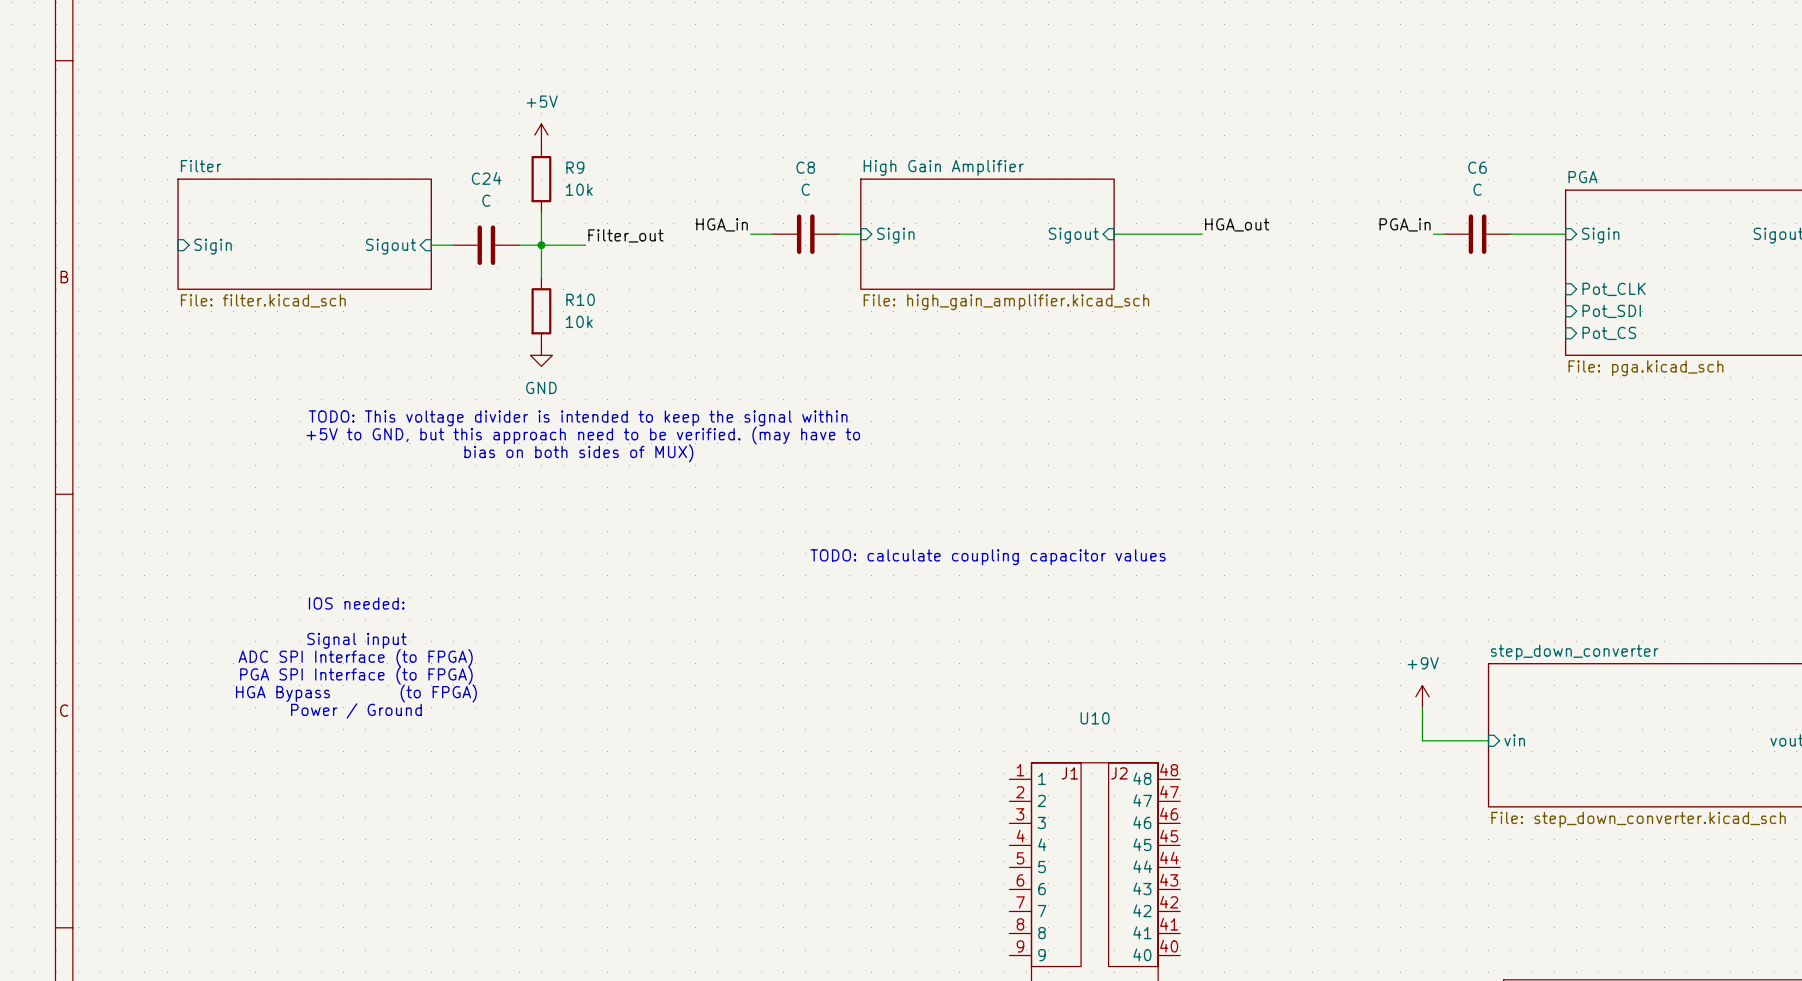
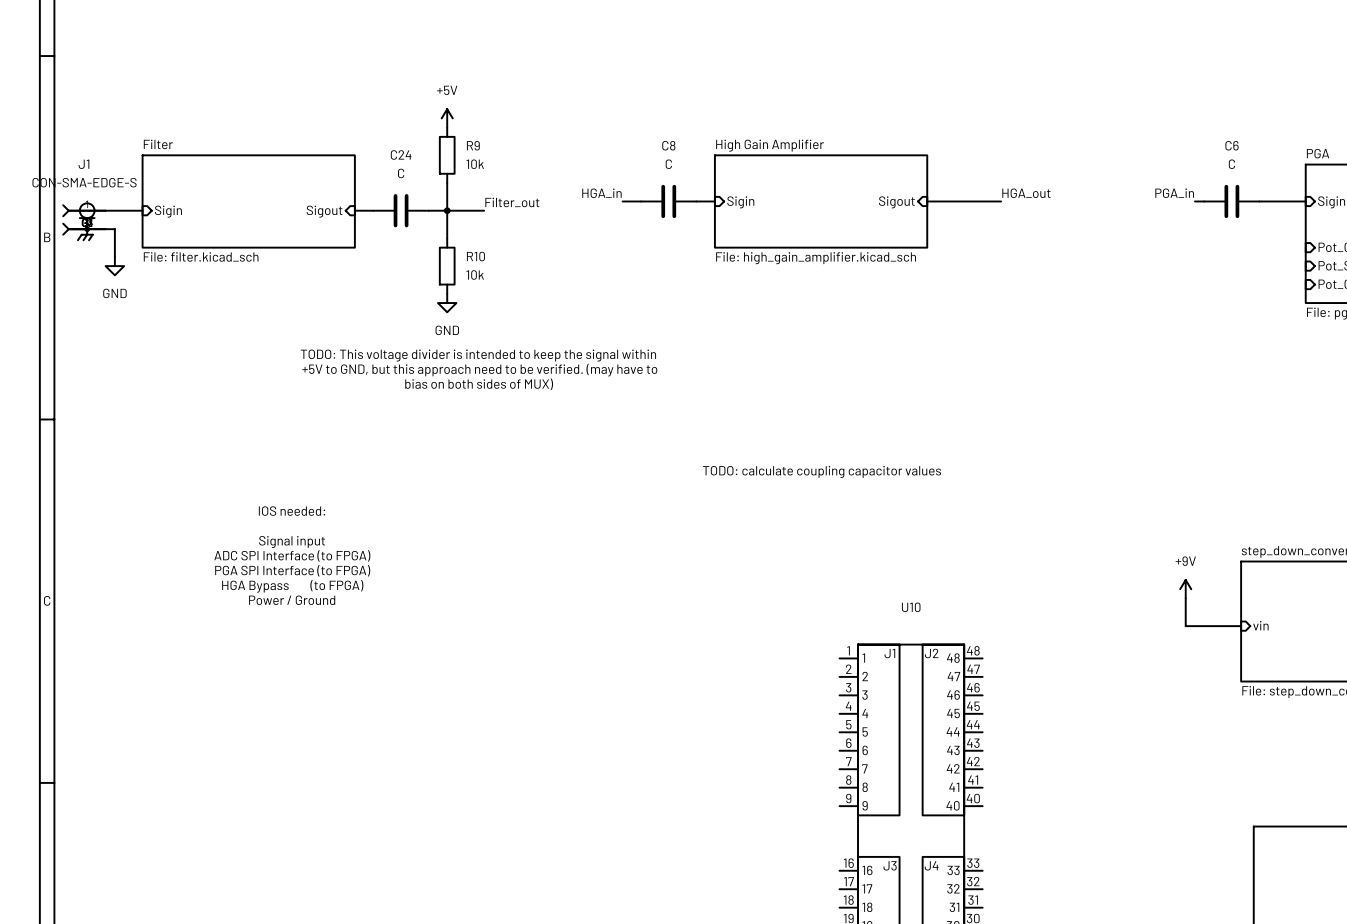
wire: none -> (105, 210) (142, 210)
J1: none -> CON-SMA-EDGE-S (84, 221)
wire: none -> (105, 229) (114, 229) (114, 256)
power symbol: none -> GND (114, 266)

